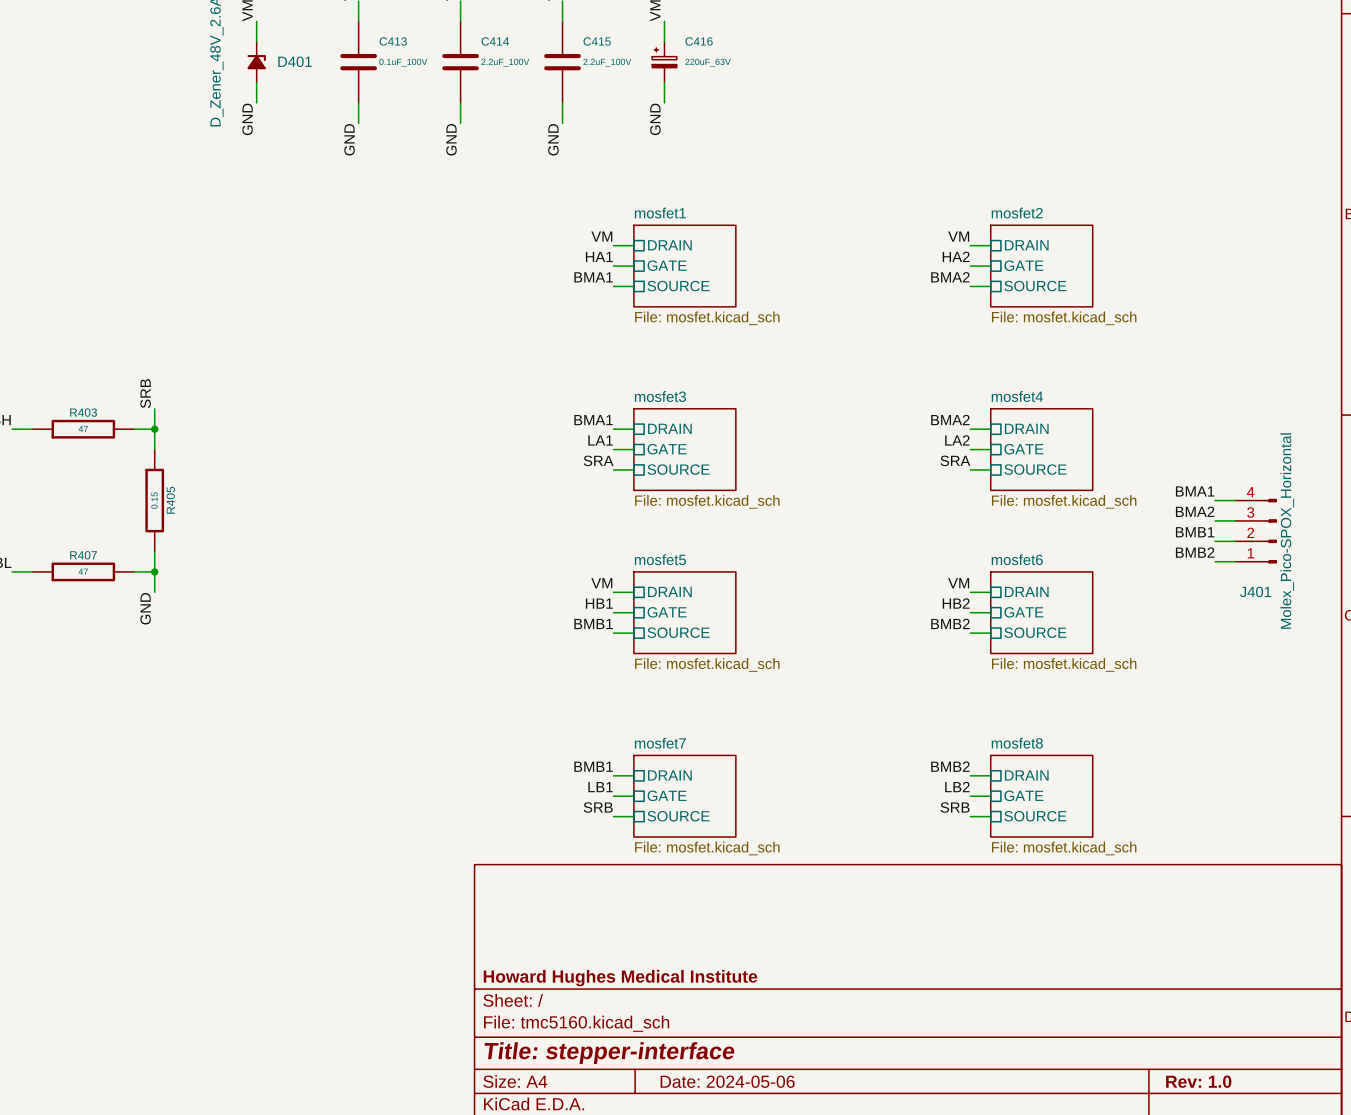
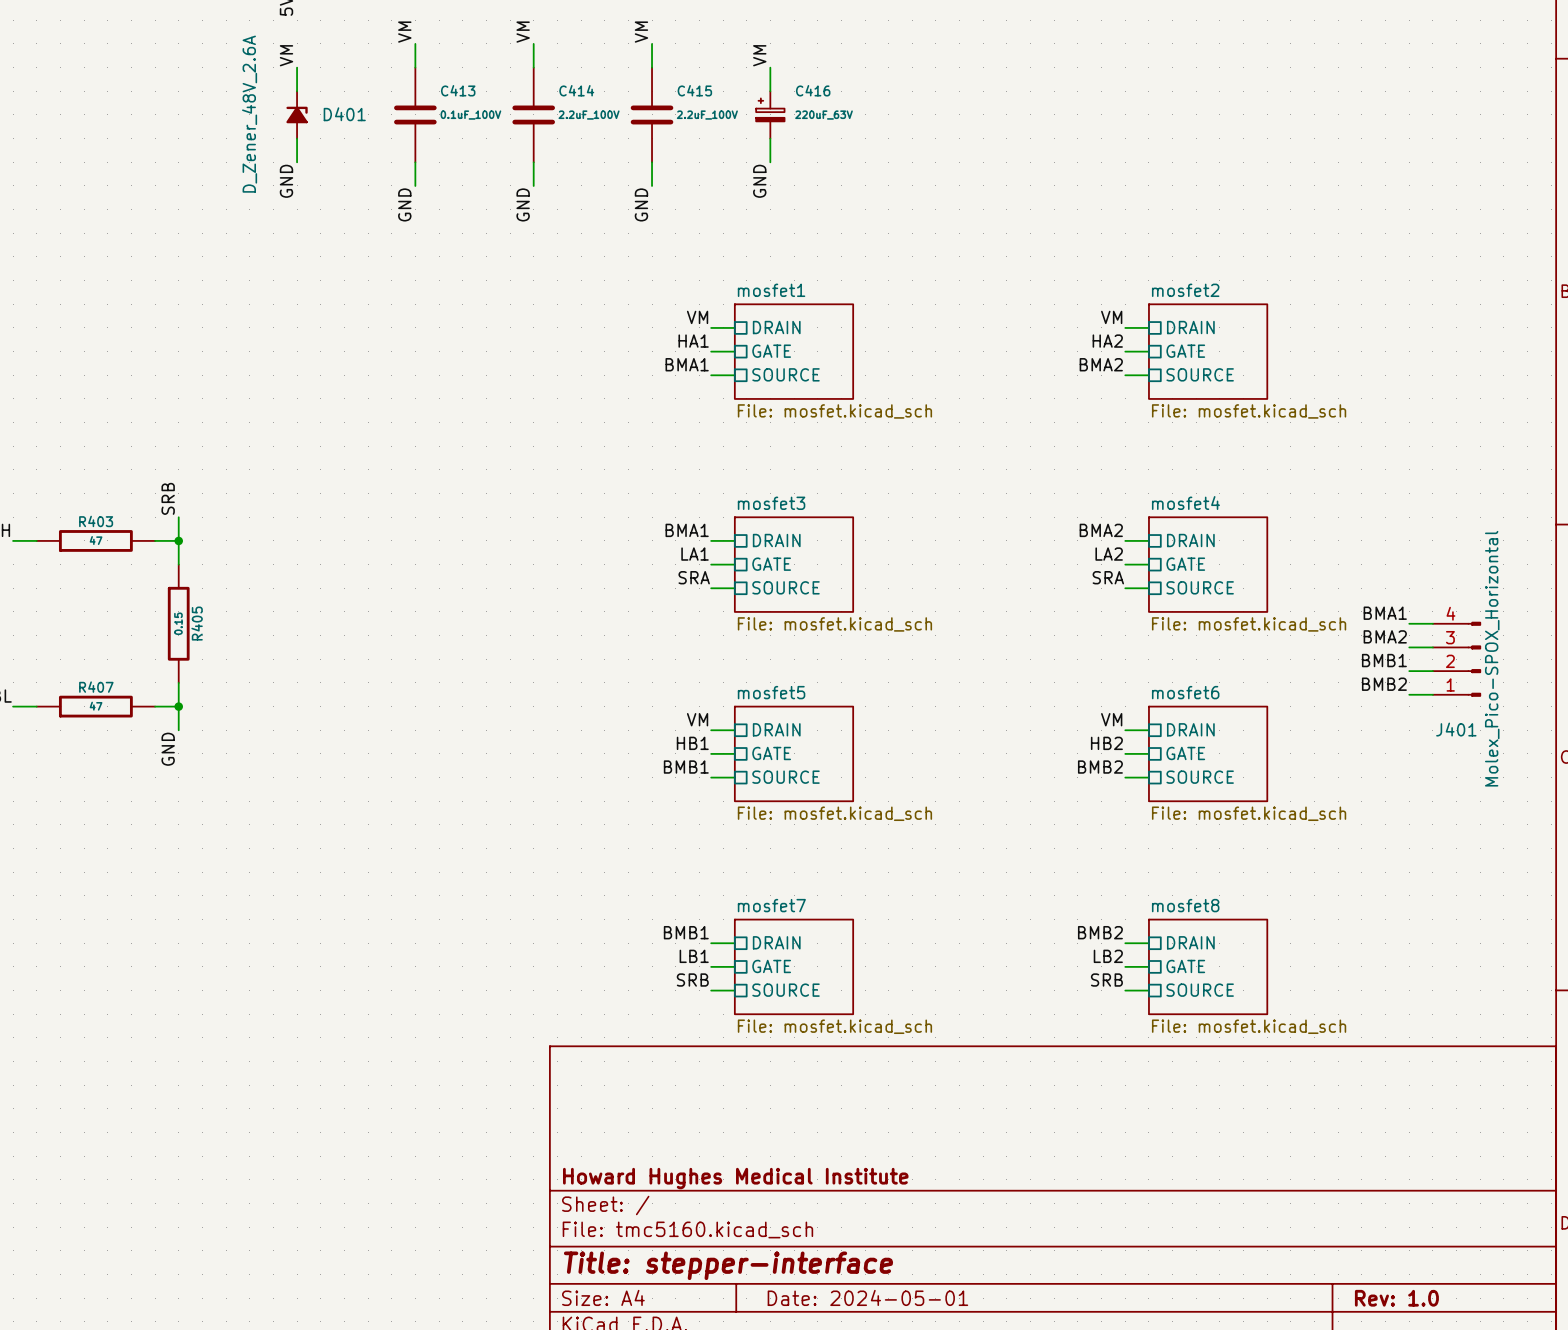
title block: Date: 2024-05-06 (727, 1081) -> Date: 2024-05-01 (867, 1297)

